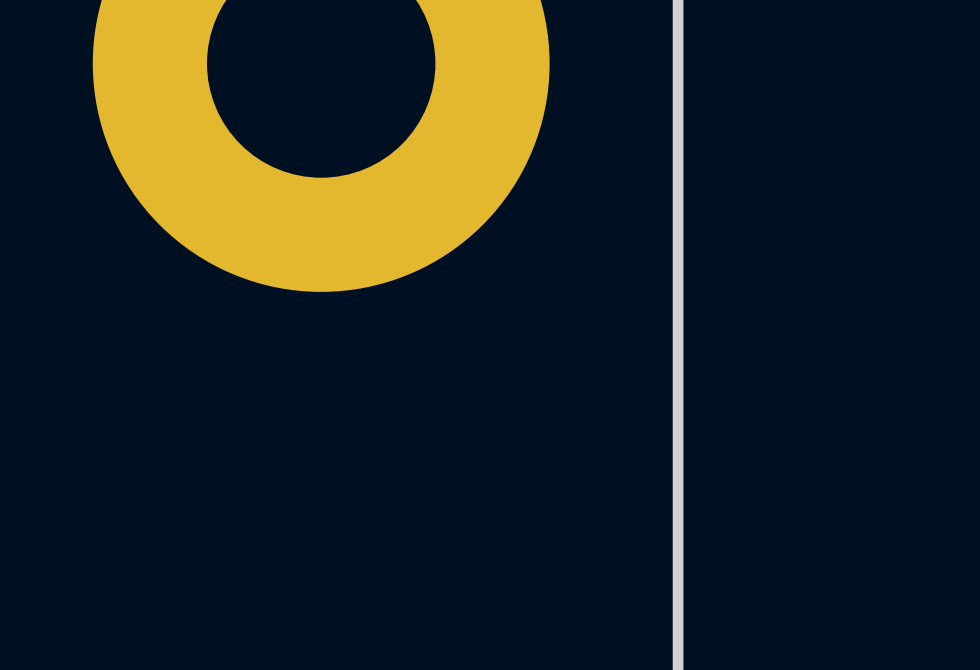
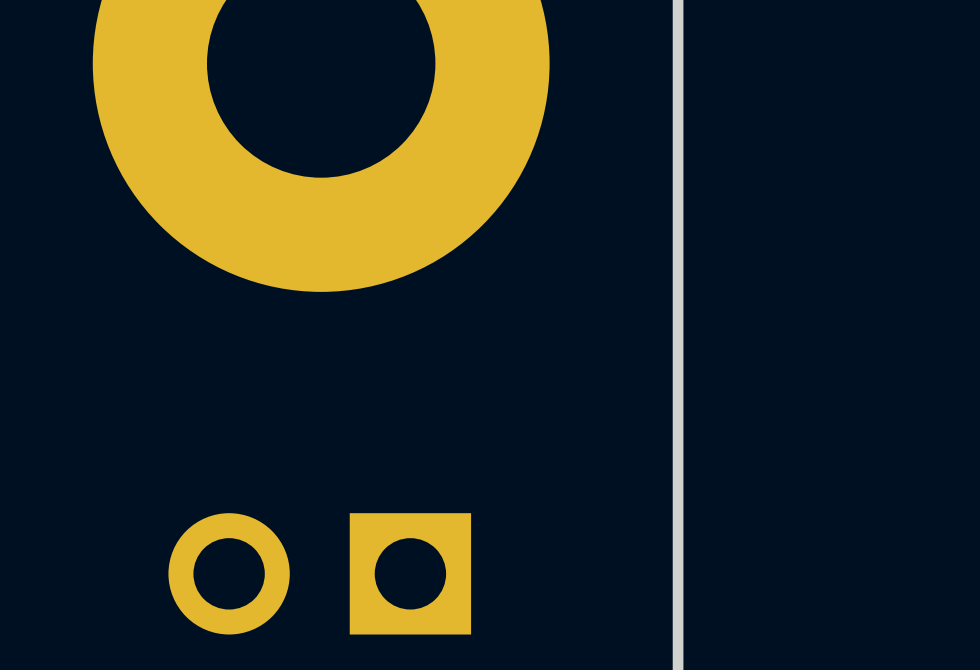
part: none -> (319, 573)

